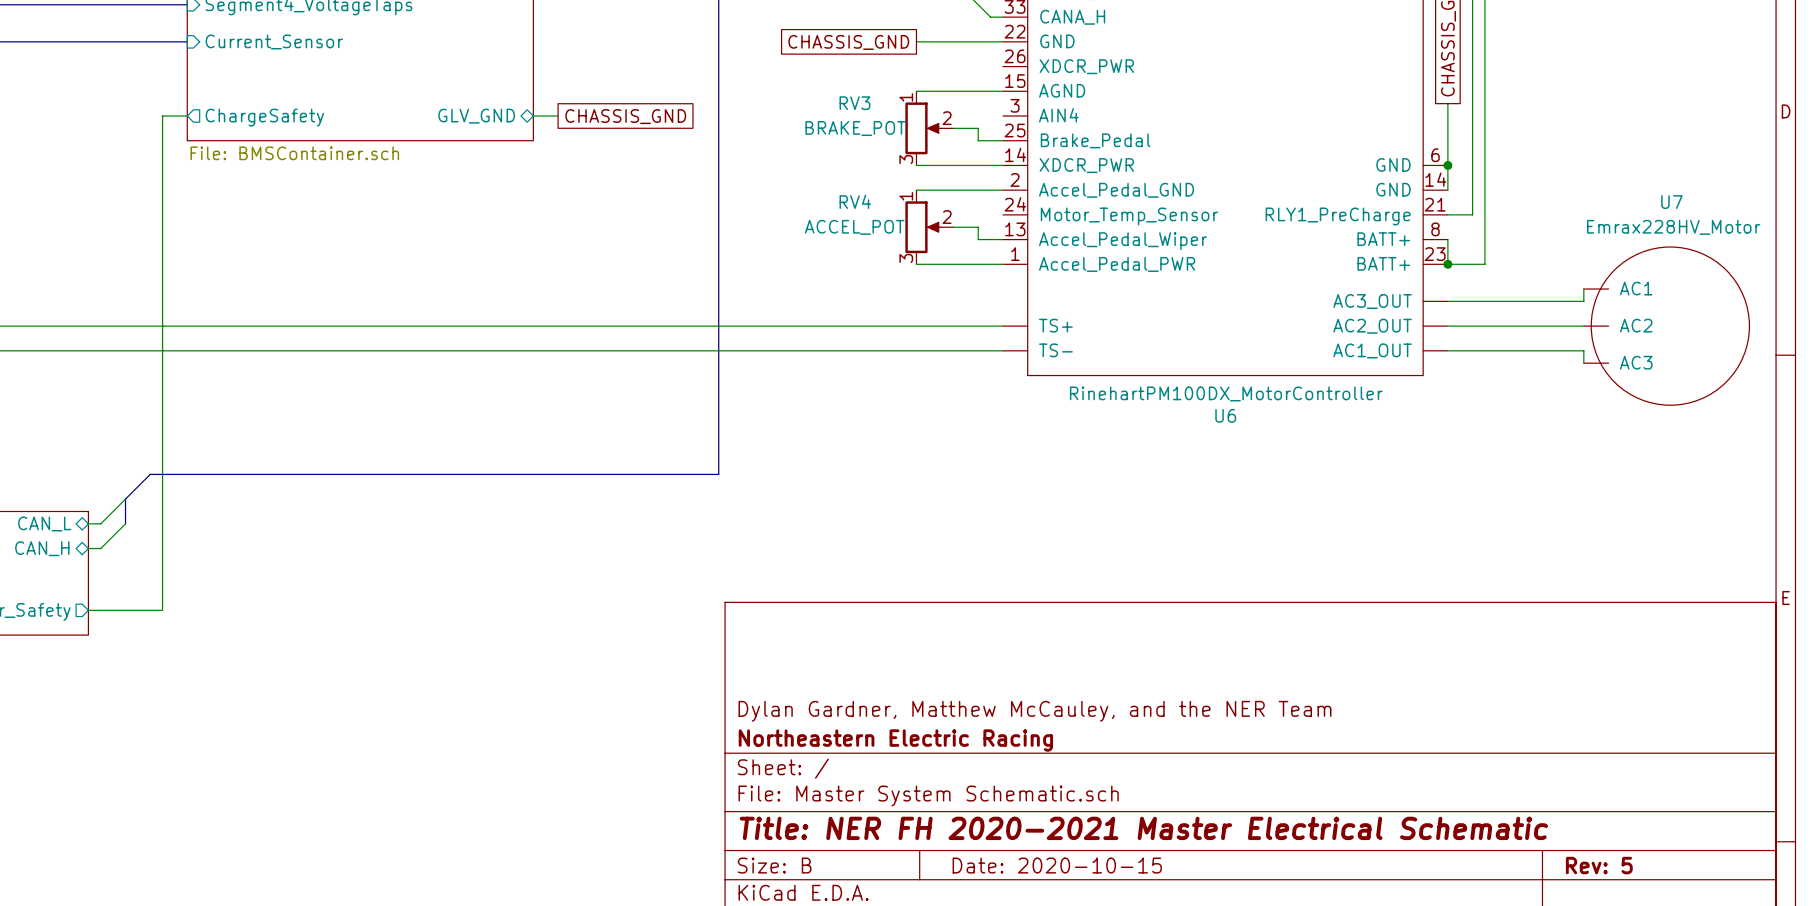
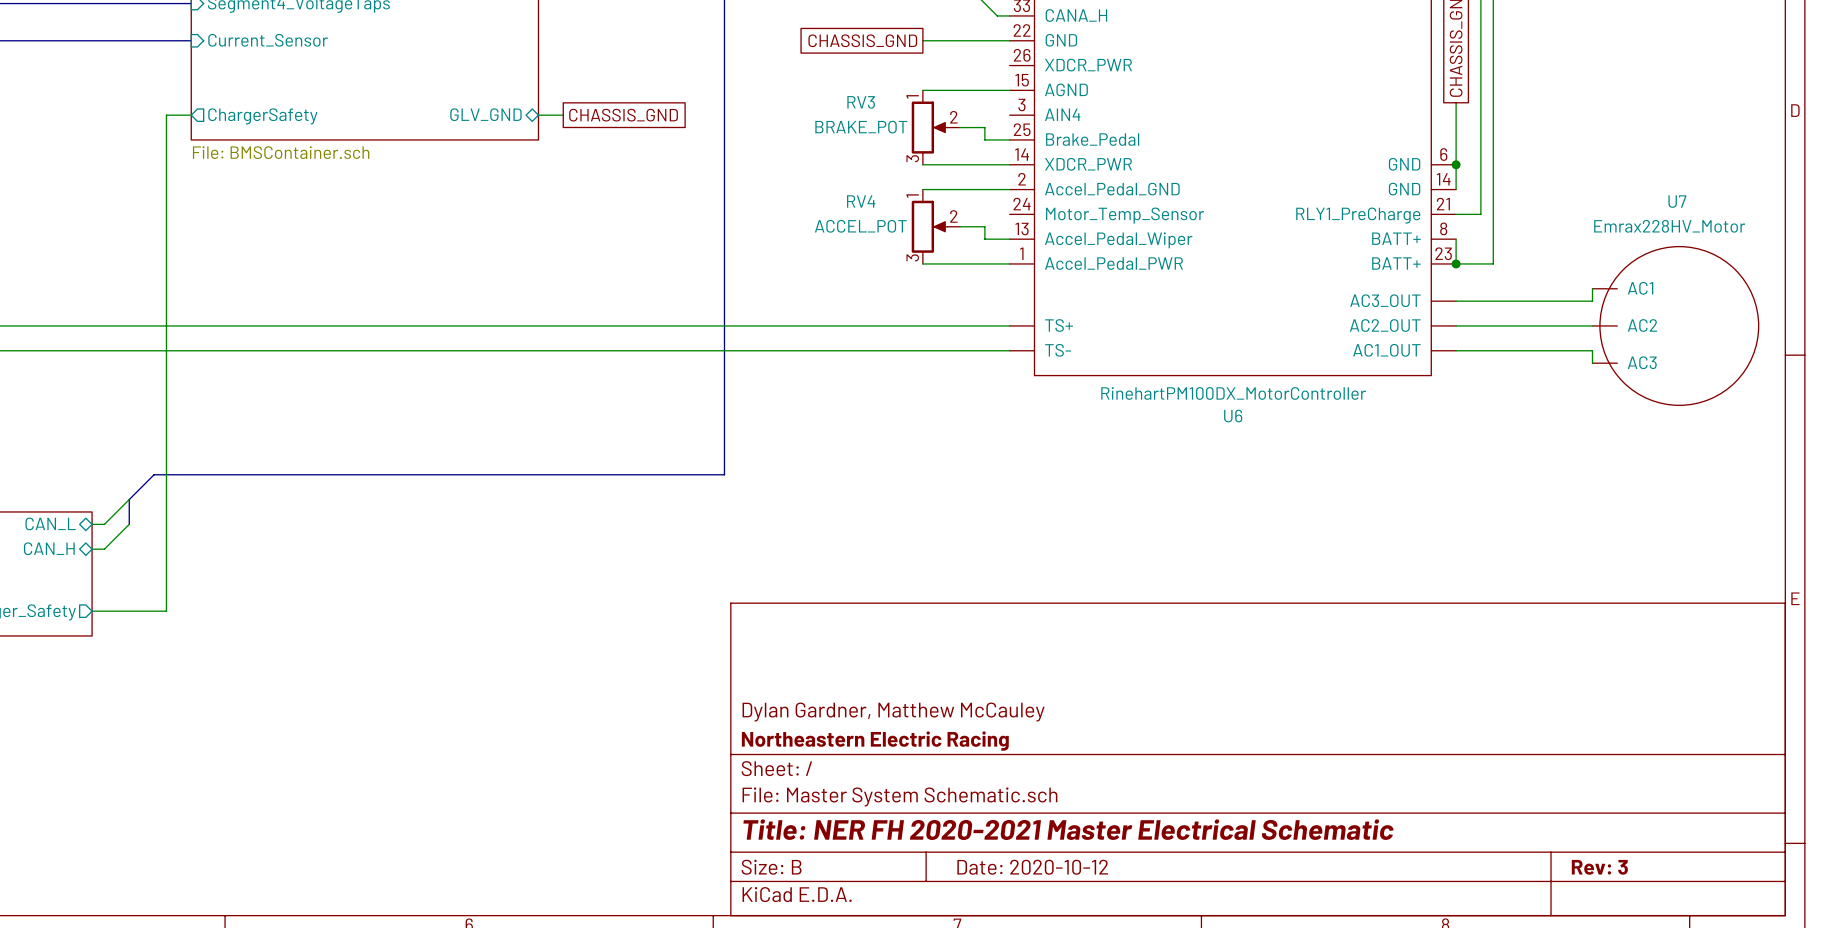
sheet pin: ChargeSafety (264, 117) -> ChargerSafety (262, 116)
title block: Dylan Gardner, Matthew McCauley, and the NER Team (1035, 711) -> Dylan Gardner, Matthew McCauley (893, 712)
title block: Date: 2020-10-15 (1057, 865) -> Date: 2020-10-12 (1032, 867)
title block: Rev: 5 (1599, 865) -> Rev: 3 (1599, 867)

